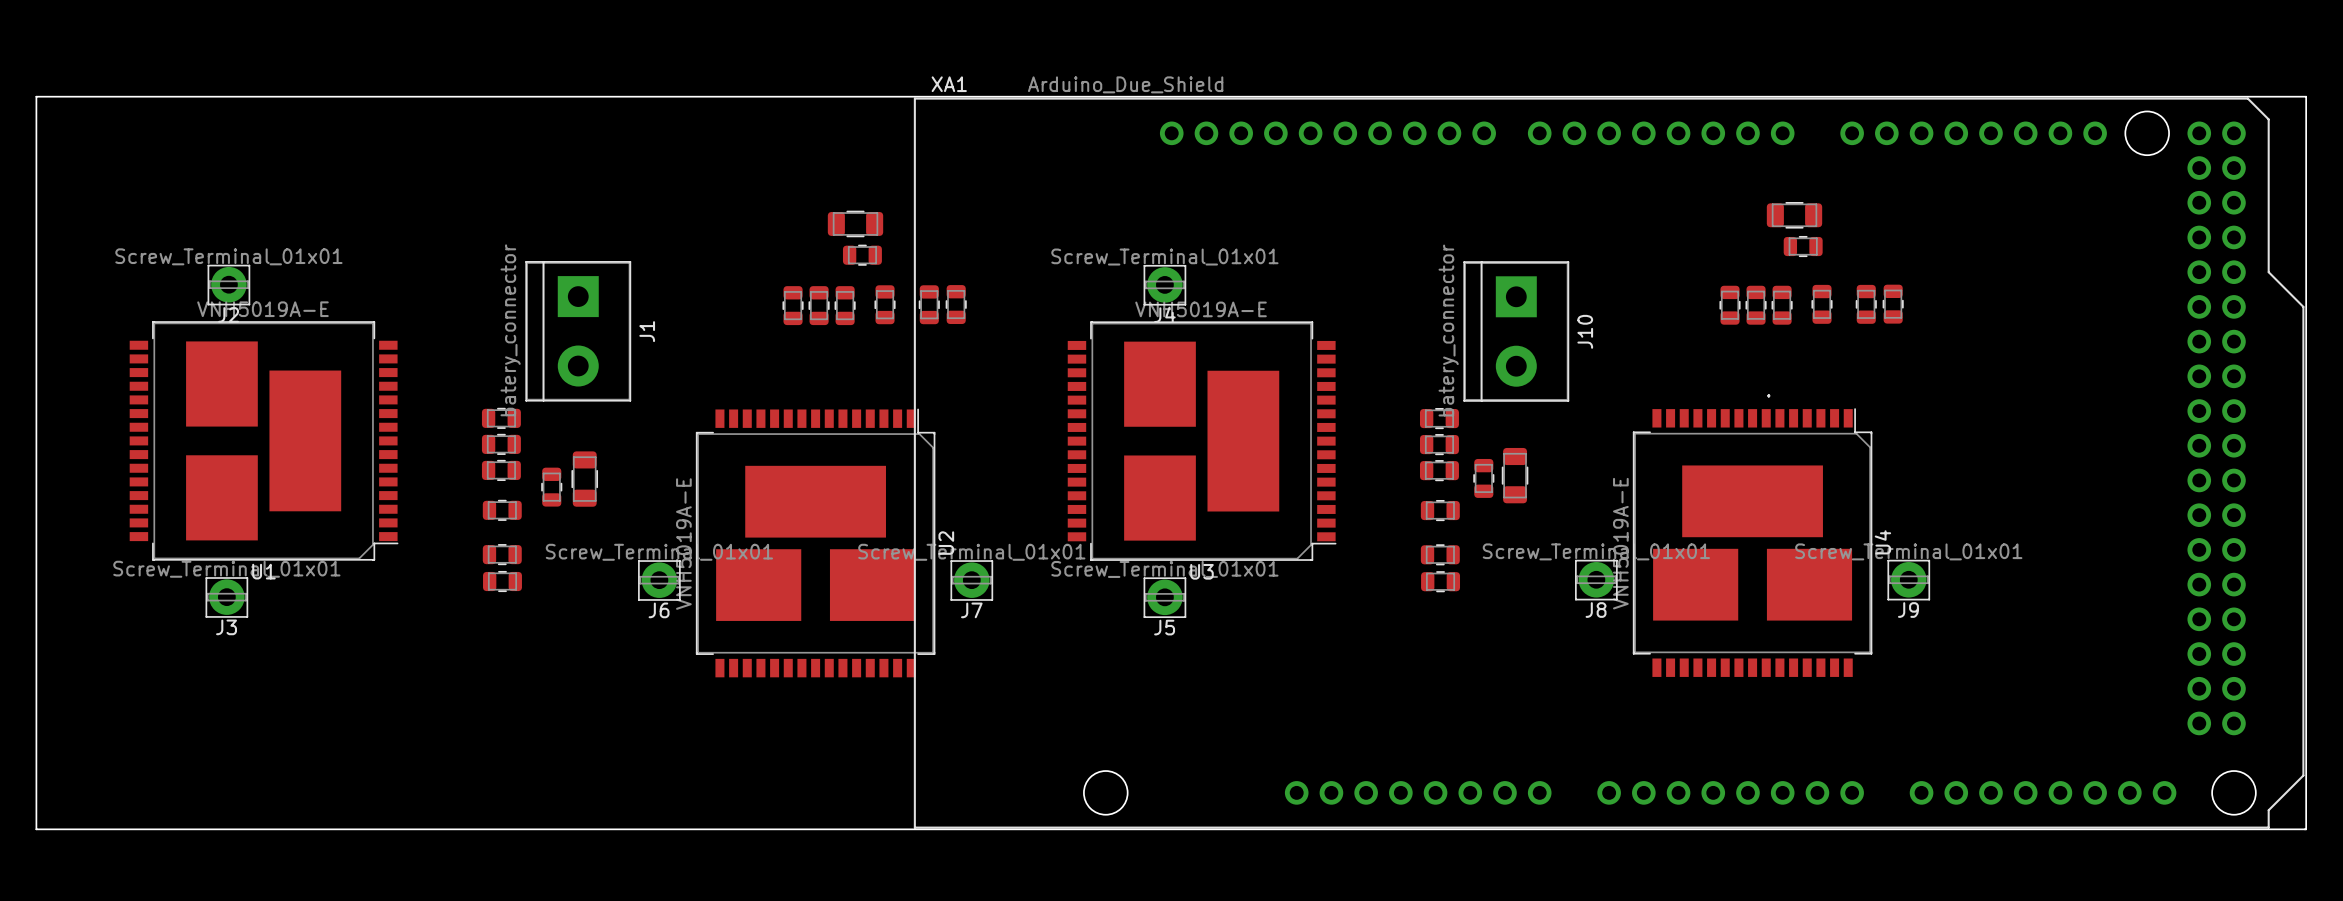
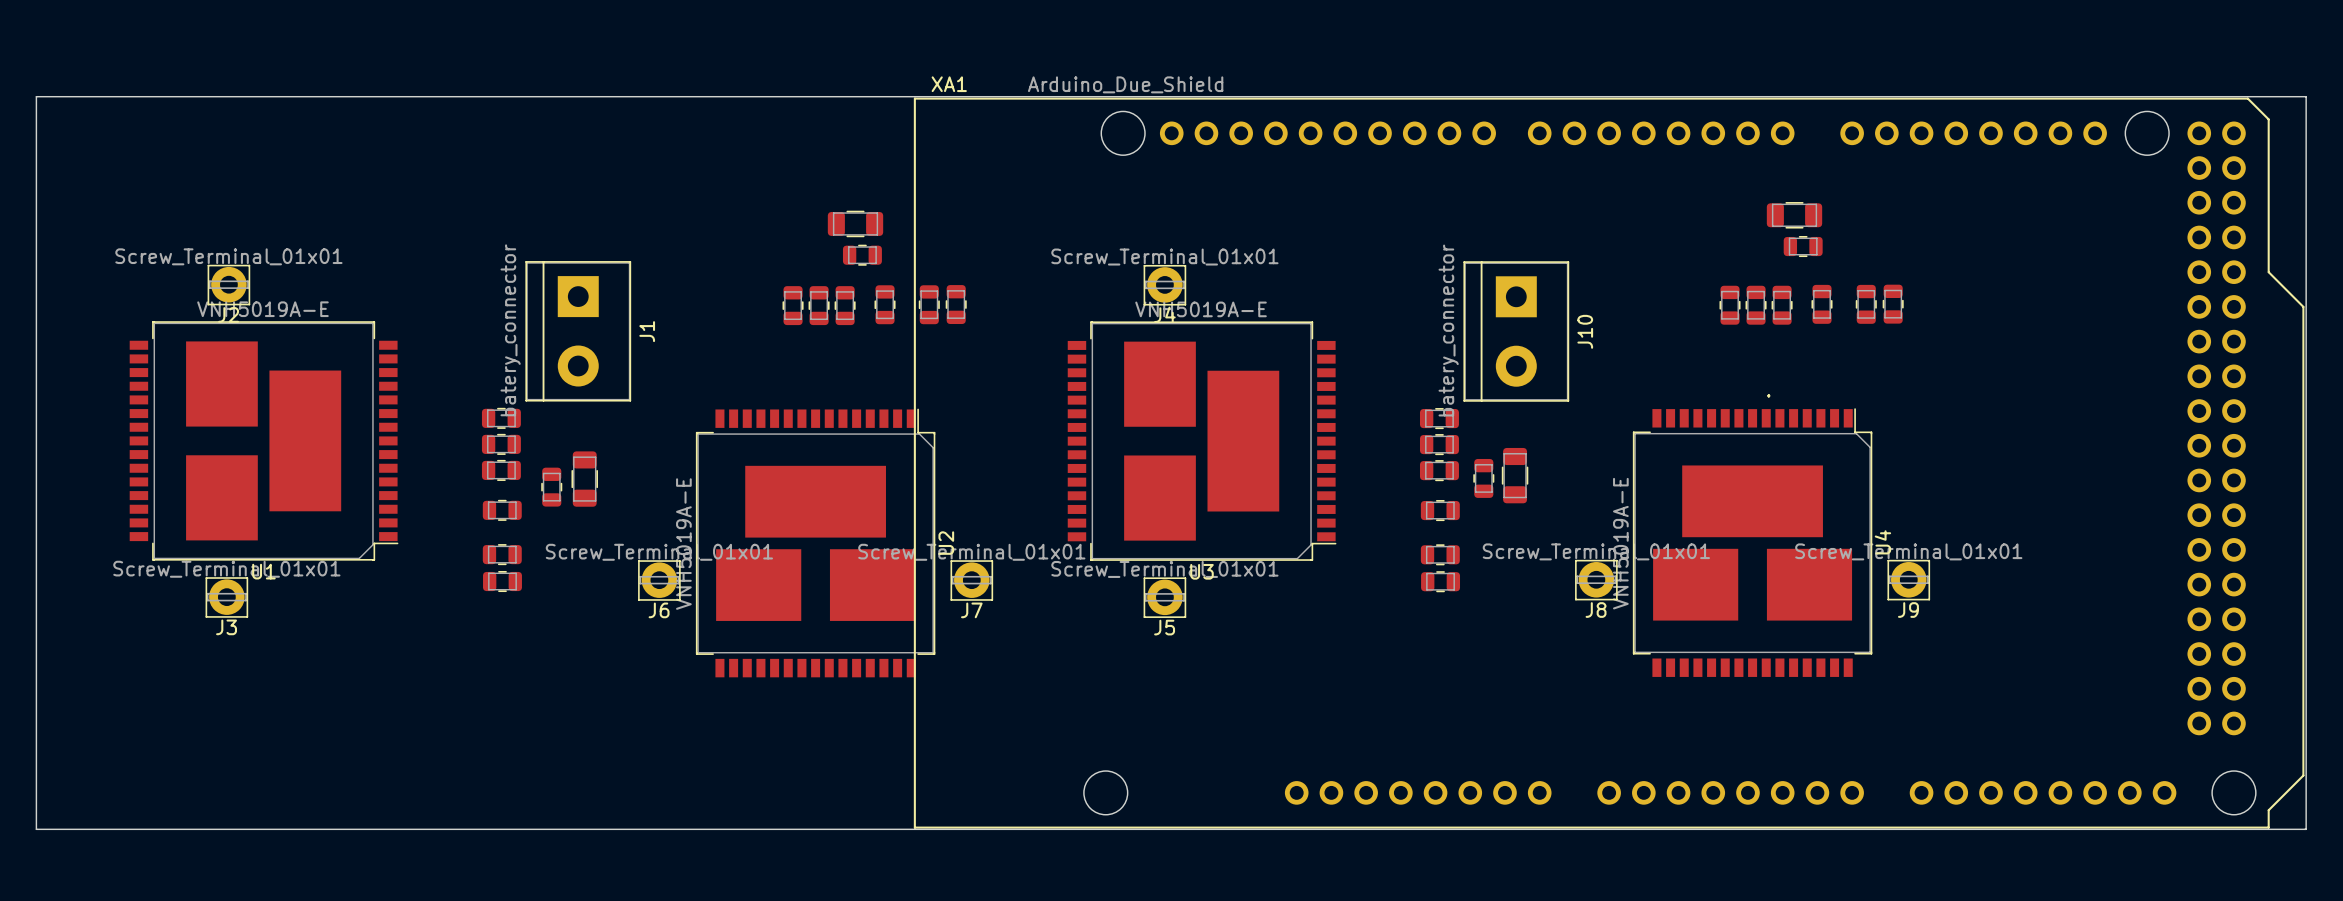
XA1 footprint: [913, 97, 2305, 829] -> [913, 97, 2305, 829]

